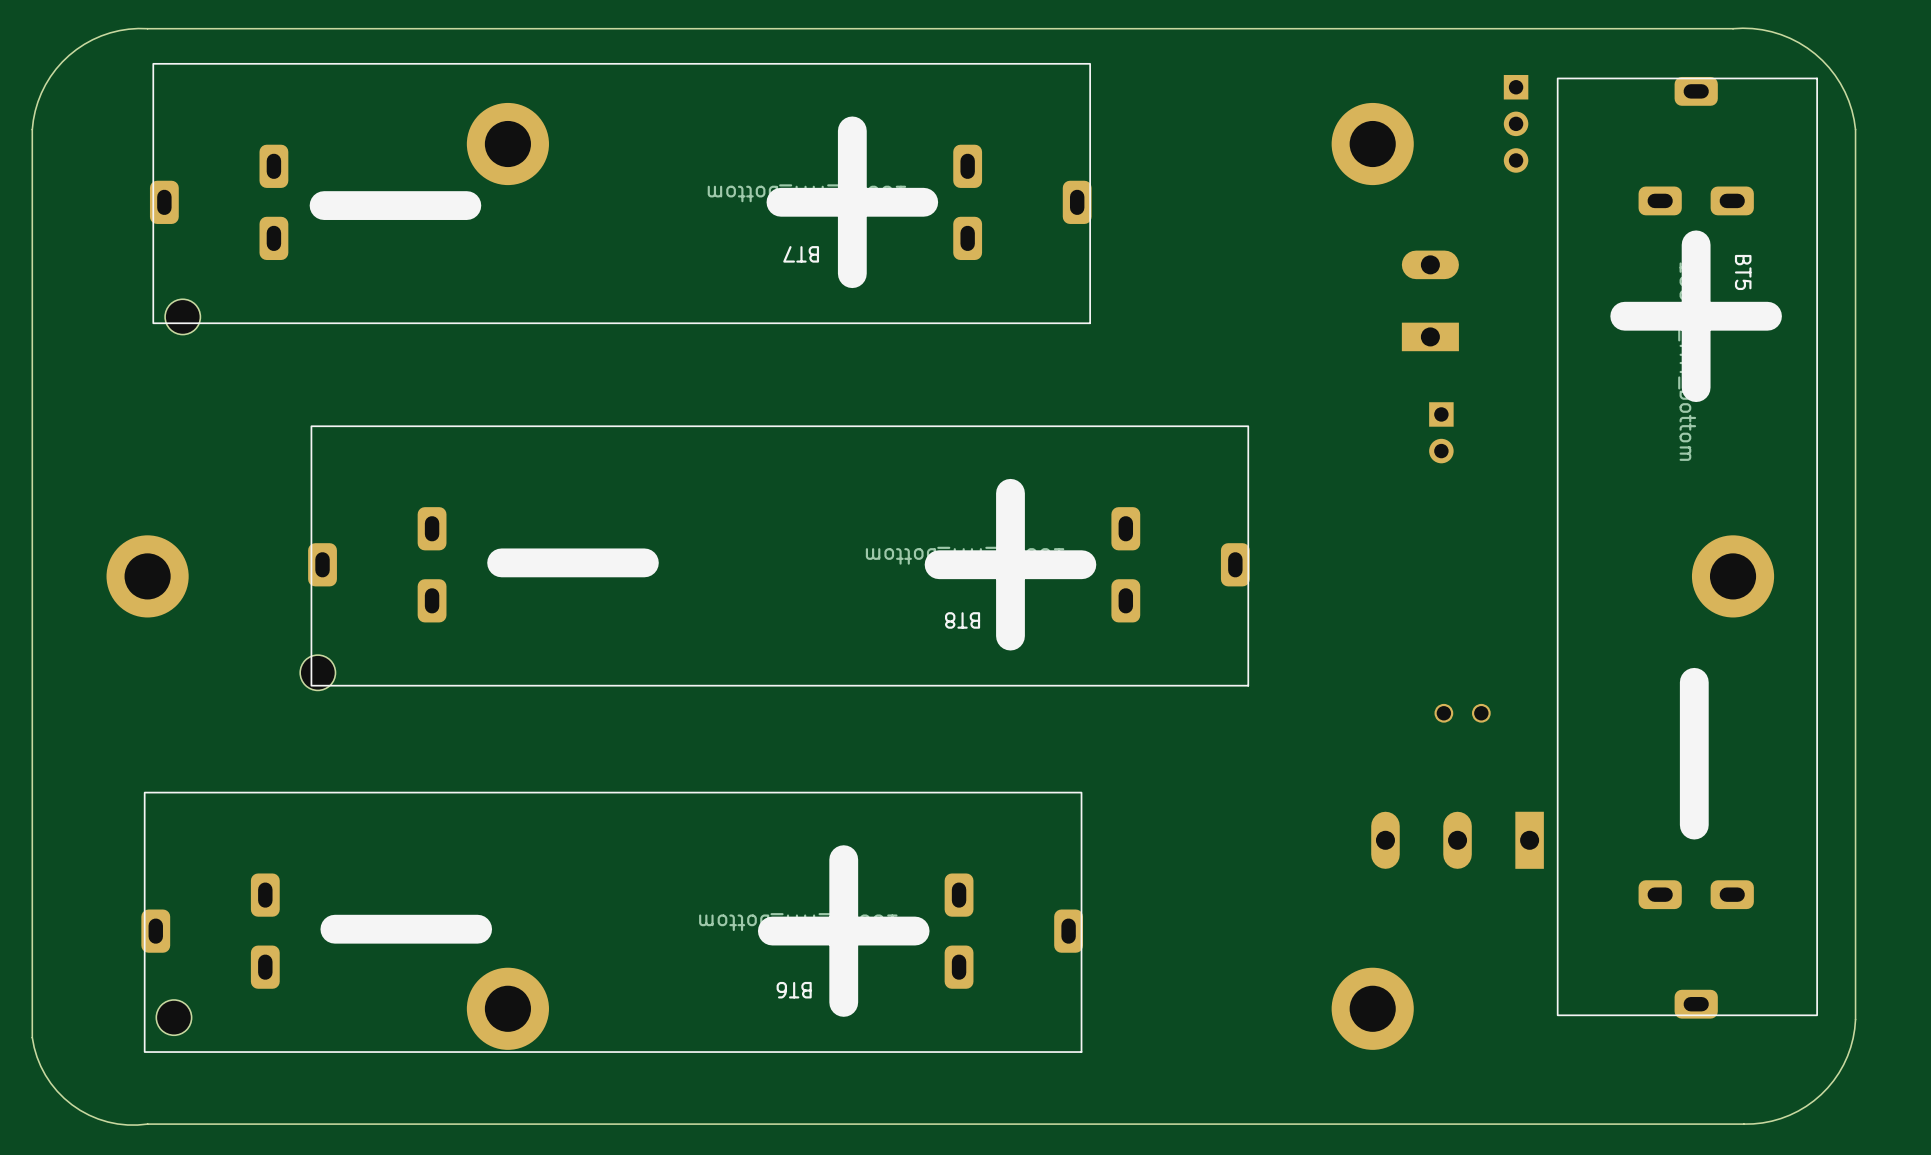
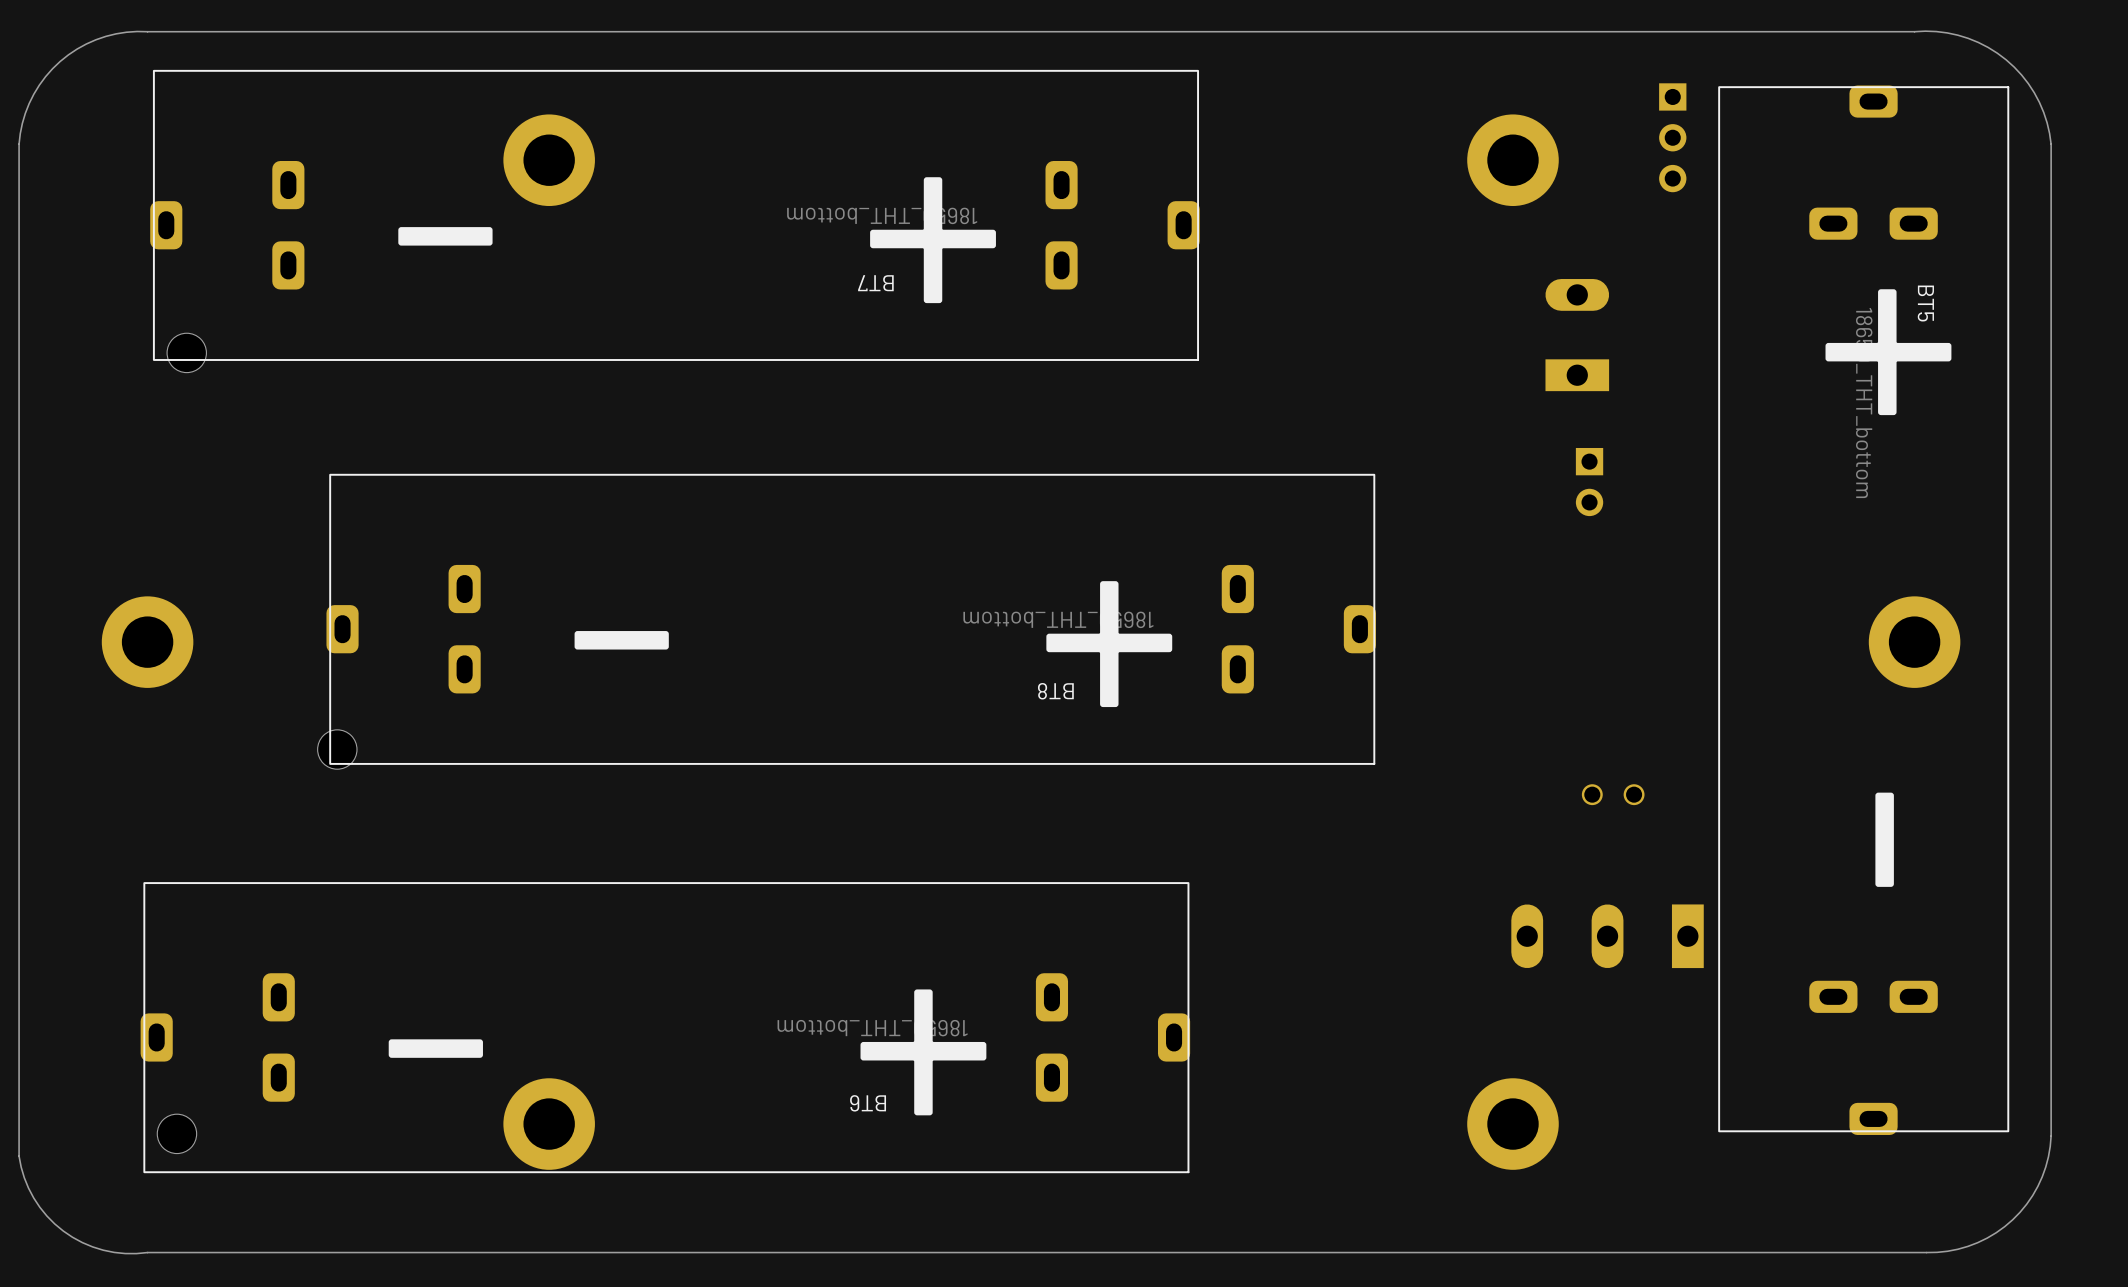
BT7 text position: - (395, 205) -> - (445, 236)

